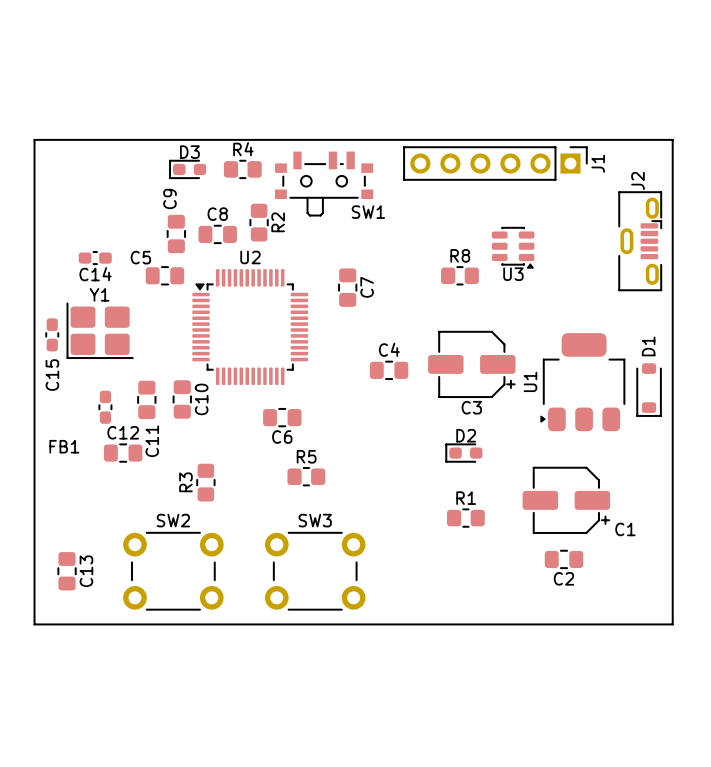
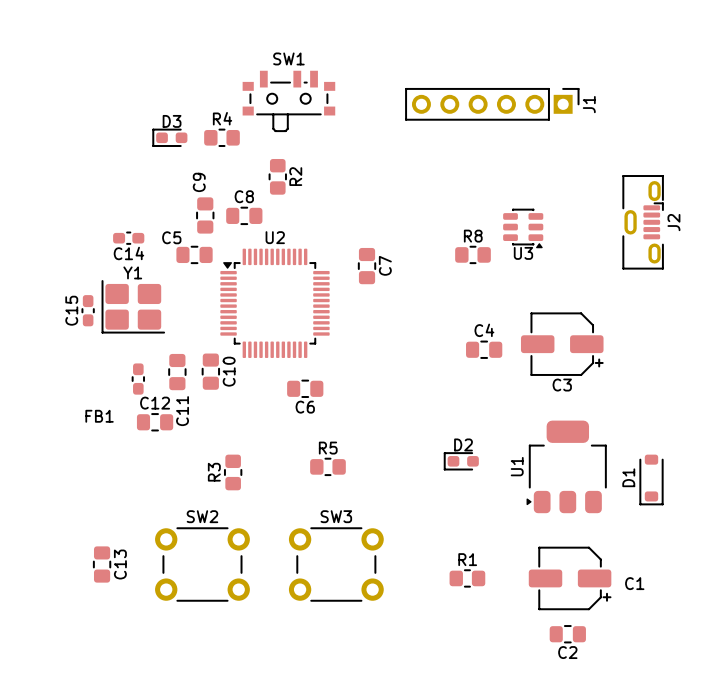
board edge: (34, 139) (34, 624) (672, 624) (672, 139) (34, 139) -> none
J1 position: (495, 163) -> (492, 104)
D3 position: (187, 169) -> (170, 137)
R4 position: (242, 169) -> (221, 137)
J2 name position: J2 (637, 180) -> J2 (673, 222)
SW1 position: (324, 183) -> (288, 101)
SW1 name position: SW1 (368, 212) -> SW1 (288, 58)
R2 position: (259, 222) -> (277, 176)
D1 name position: D1 (648, 346) -> D1 (628, 477)
C3 position: (471, 364) -> (562, 344)
C4 position: (389, 370) -> (484, 349)
C15 name position: C15 (52, 375) -> C15 (71, 310)
U1 position: (582, 382) -> (566, 466)
D1 position: (649, 389) -> (651, 479)
D2 position: (464, 453) -> (461, 461)
R5 position: (306, 476) -> (327, 466)
R3 position: (205, 482) -> (233, 472)
C1 position: (566, 500) -> (570, 578)
R1 position: (465, 518) -> (467, 578)
C1 name position: C1 (625, 529) -> C1 (634, 583)
C2 position: (563, 559) -> (567, 634)
C13 position: (67, 571) -> (102, 564)
SW2 position: (173, 571) -> (202, 564)
SW3 position: (315, 571) -> (336, 564)

